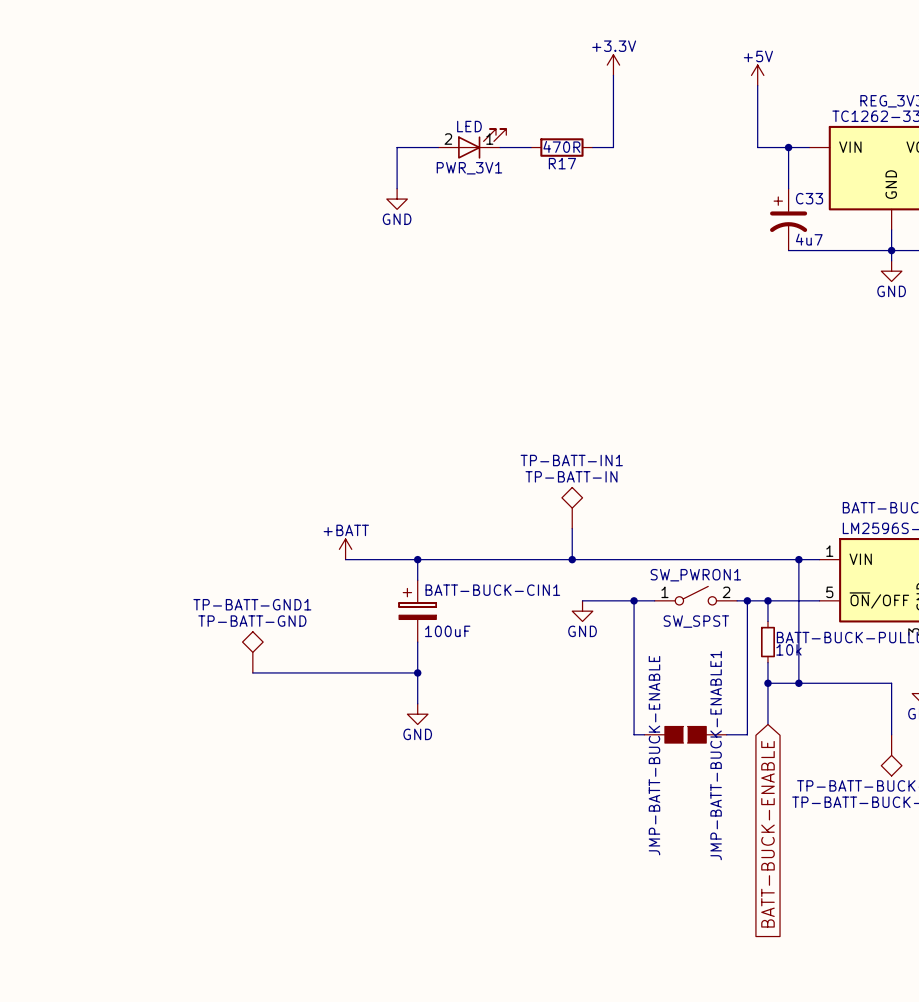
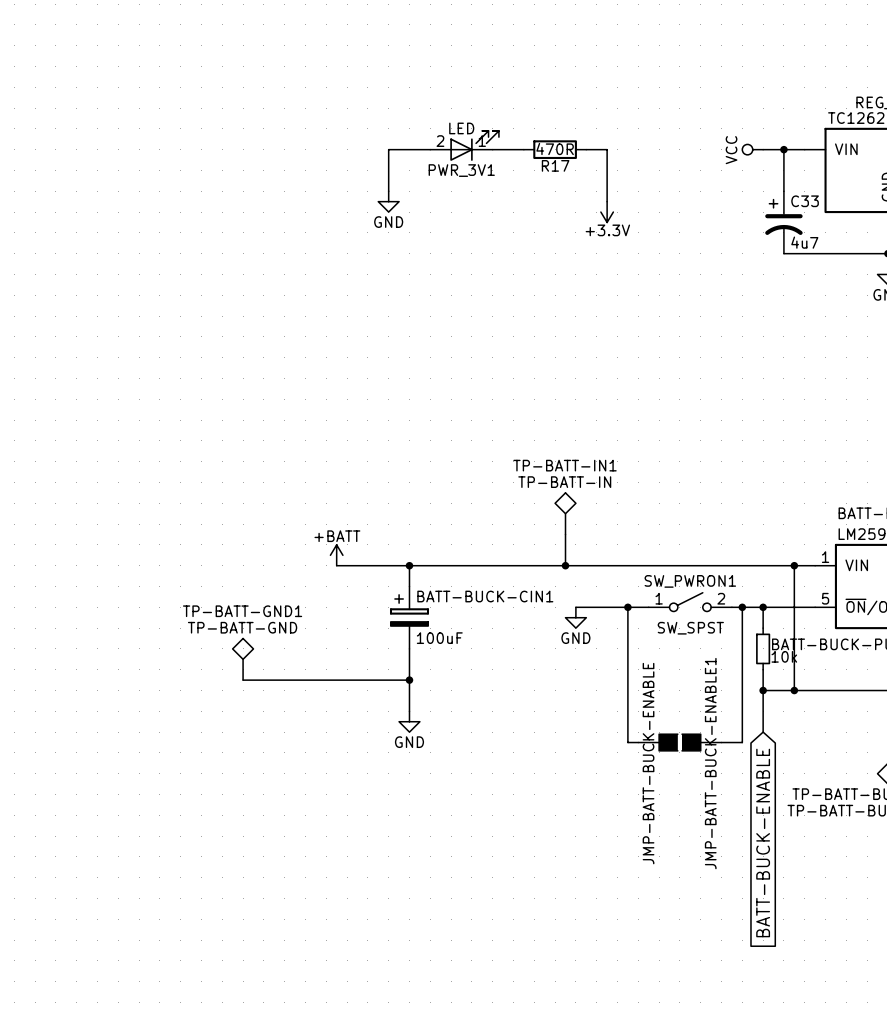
power symbol rotation: 0° (613, 65) -> 180° (607, 212)
power symbol position: +3.3V (613, 65) -> +3.3V (607, 212)
wire: (613, 75) (613, 147) -> (607, 201) (607, 149)
power symbol: +5V (757, 75) -> none
wire: (757, 85) (757, 147) (767, 147) -> none
power symbol: none -> VCC (752, 149)

